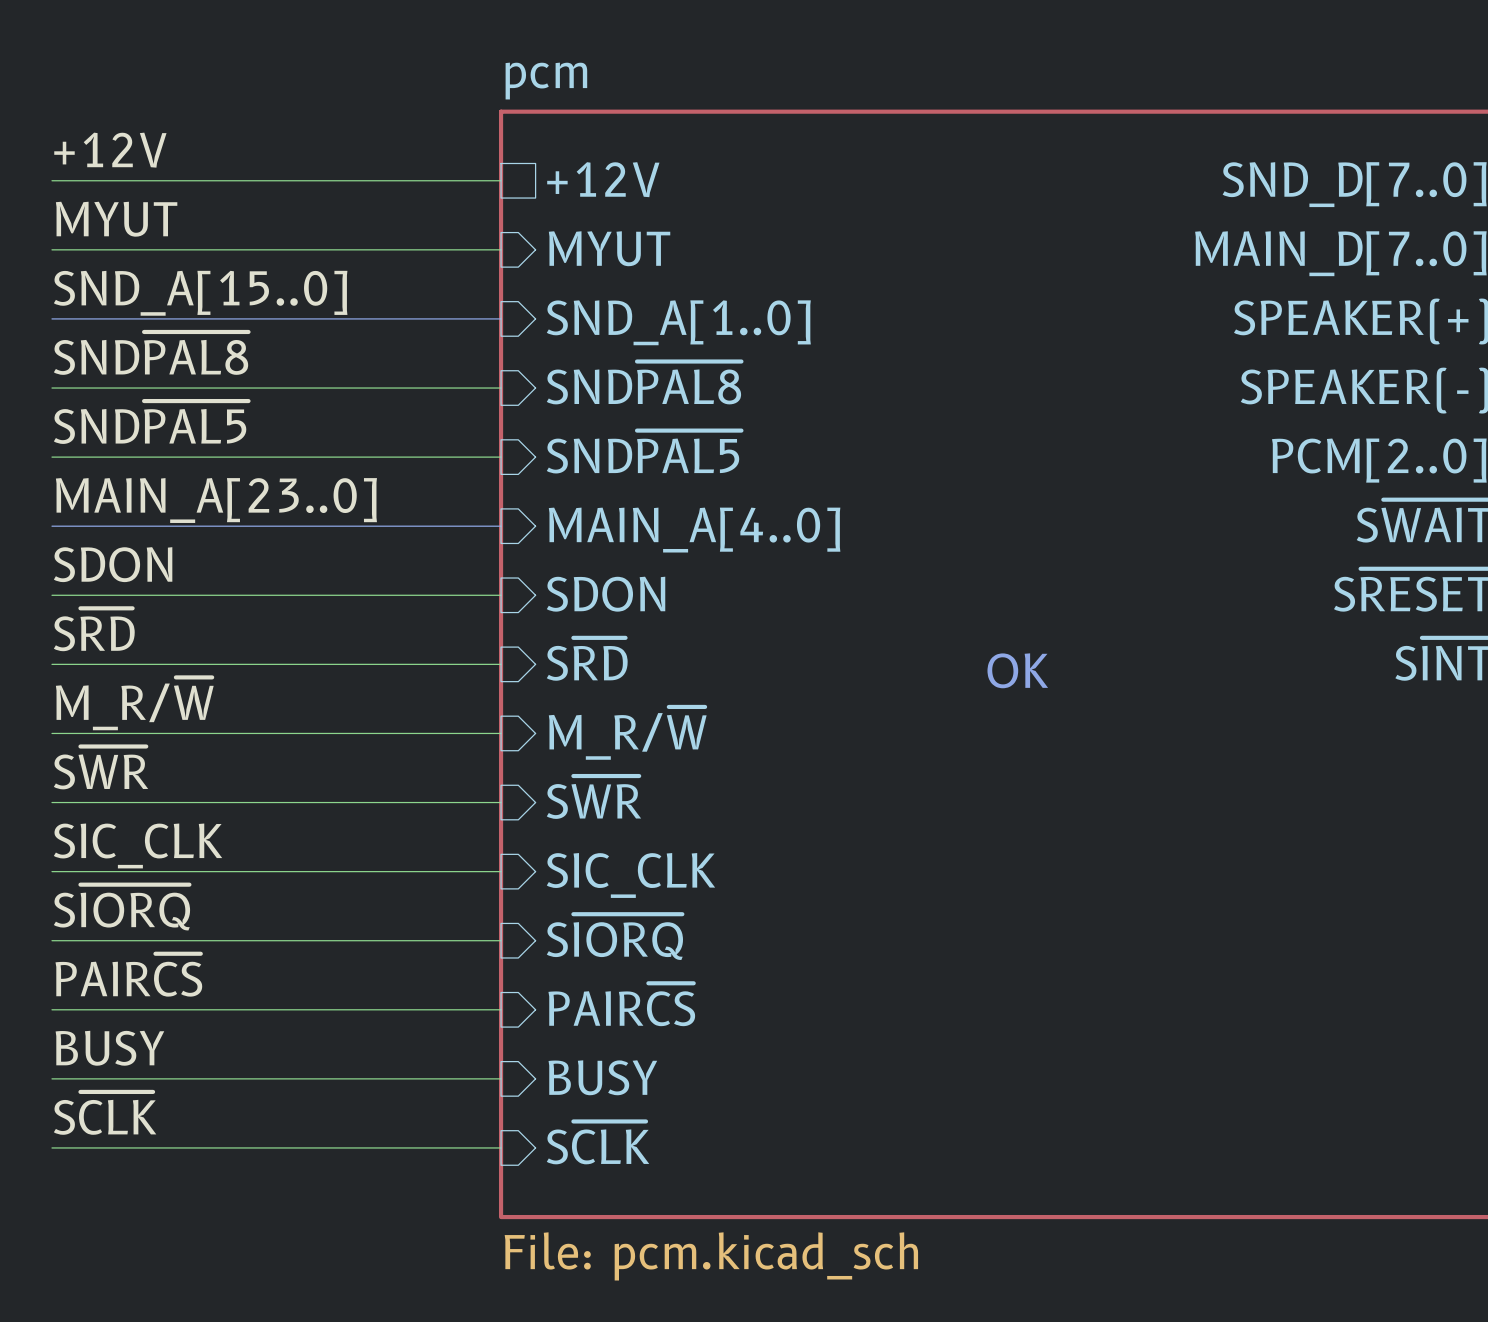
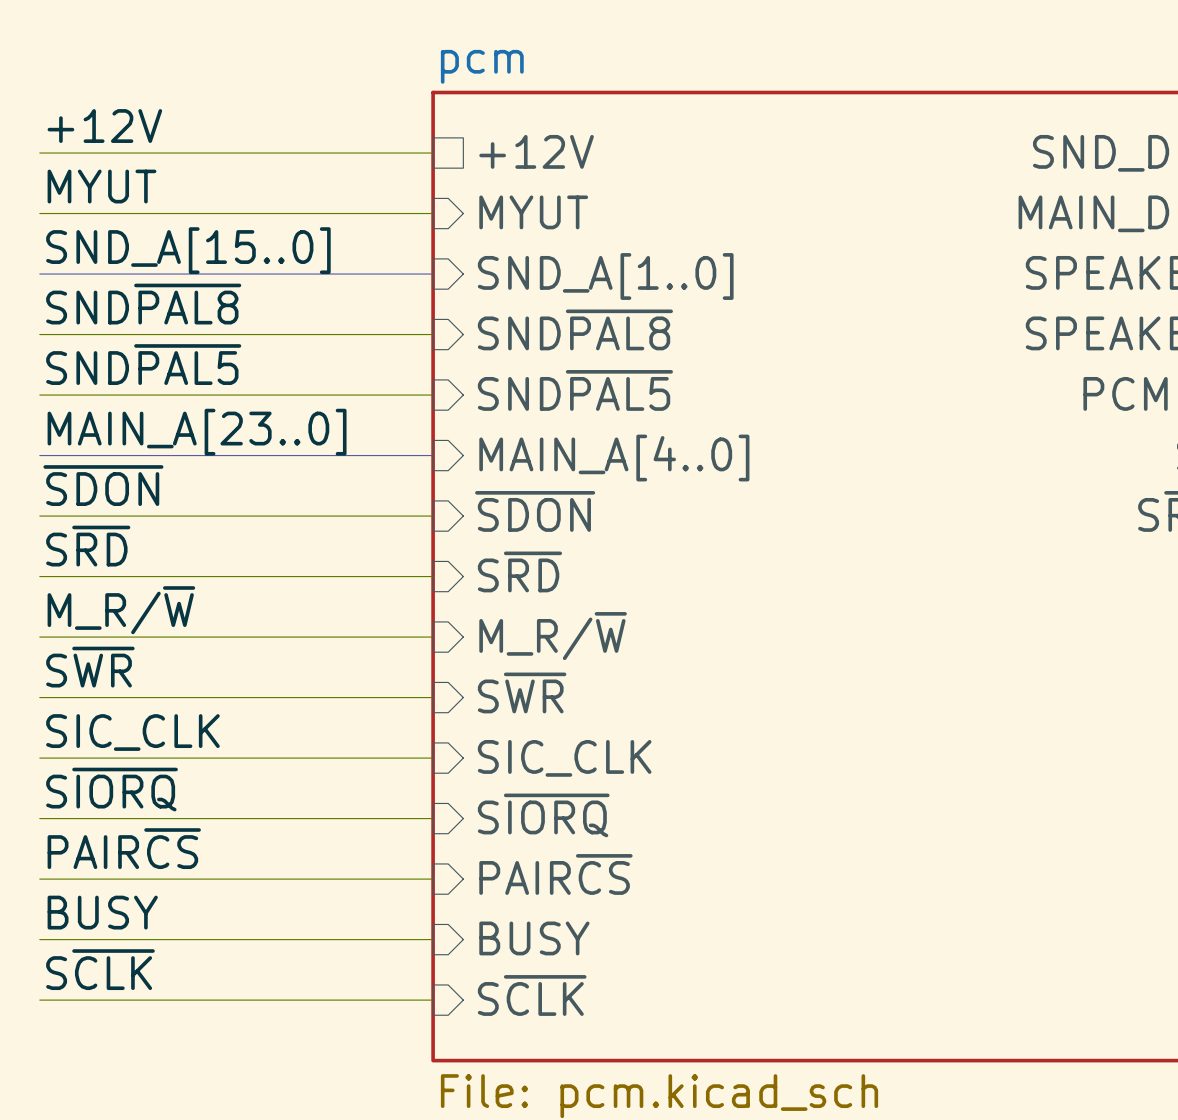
label: SDON (113, 564) -> ~{SDON} (103, 485)
sheet pin: SDON (606, 594) -> ~{SDON} (535, 511)
text: OK (1017, 670) -> none

